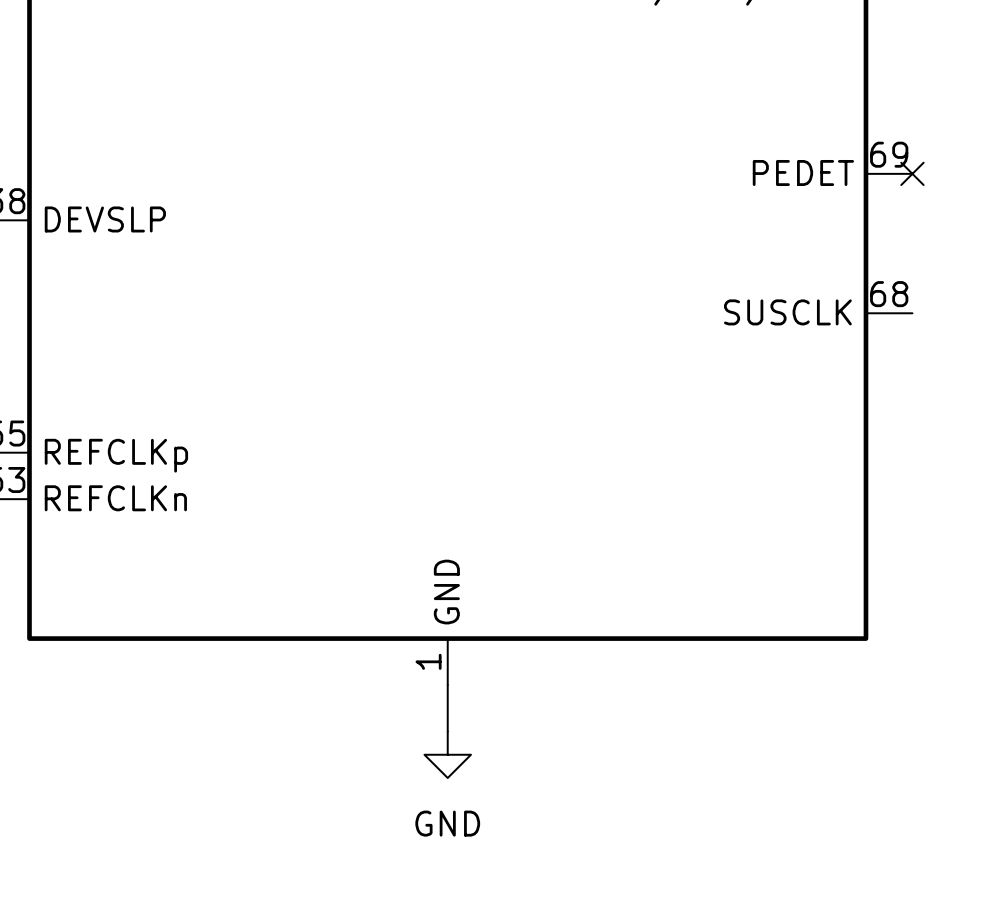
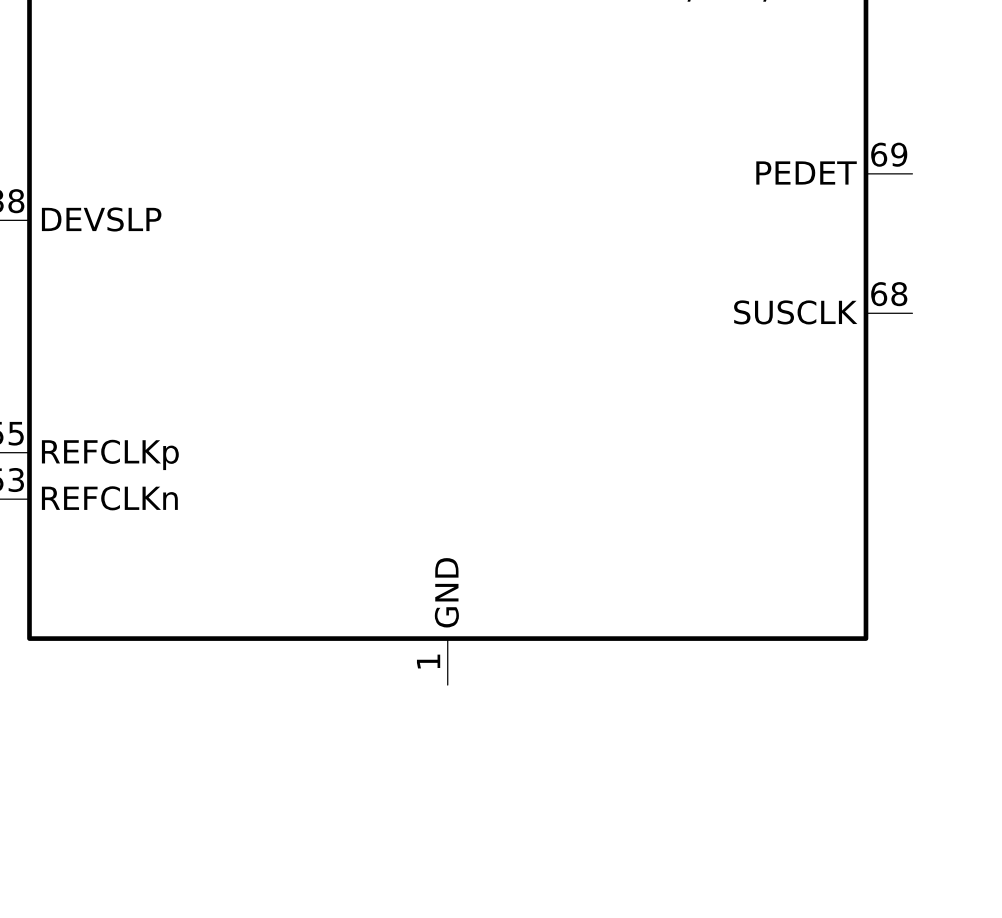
no-connect mark: (912, 173) -> none
wire: (447, 685) (447, 731) -> none
power symbol: GND (447, 754) -> none

